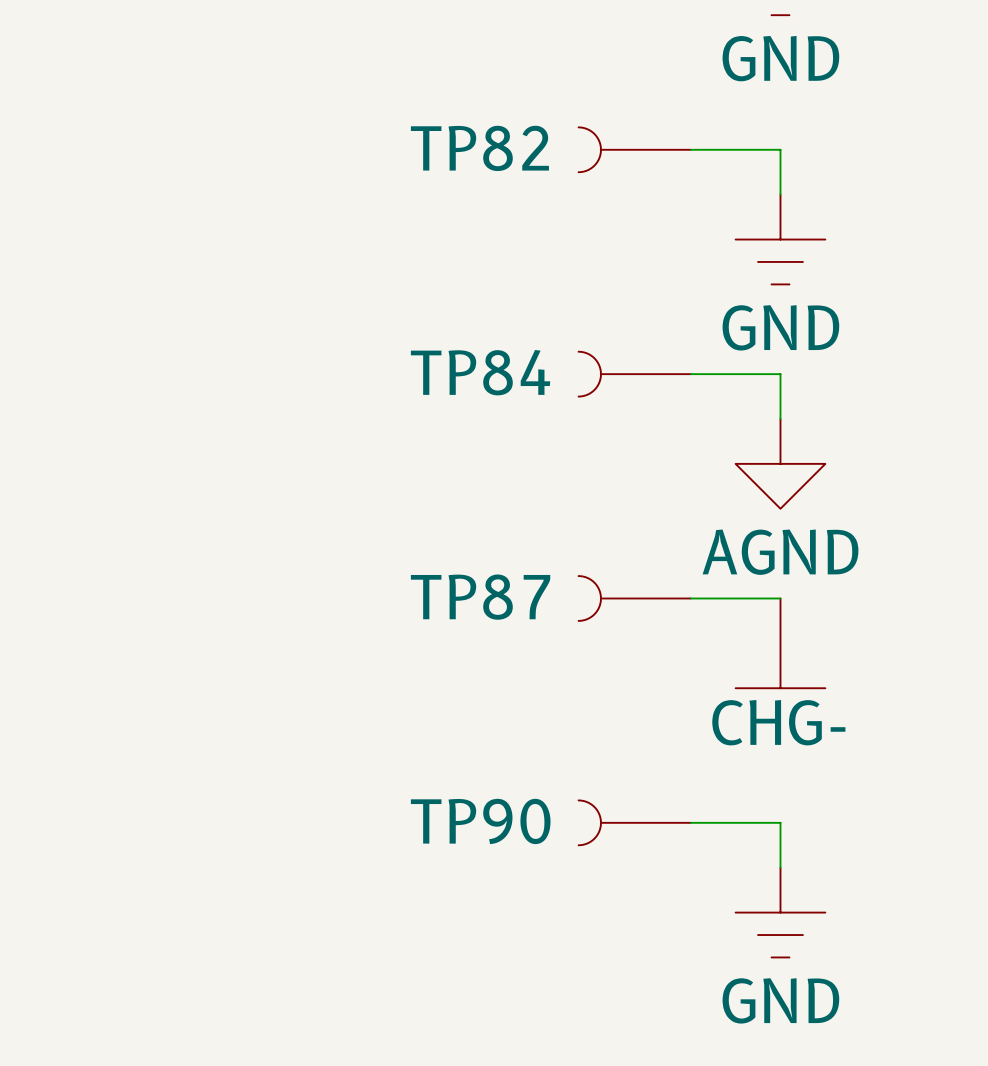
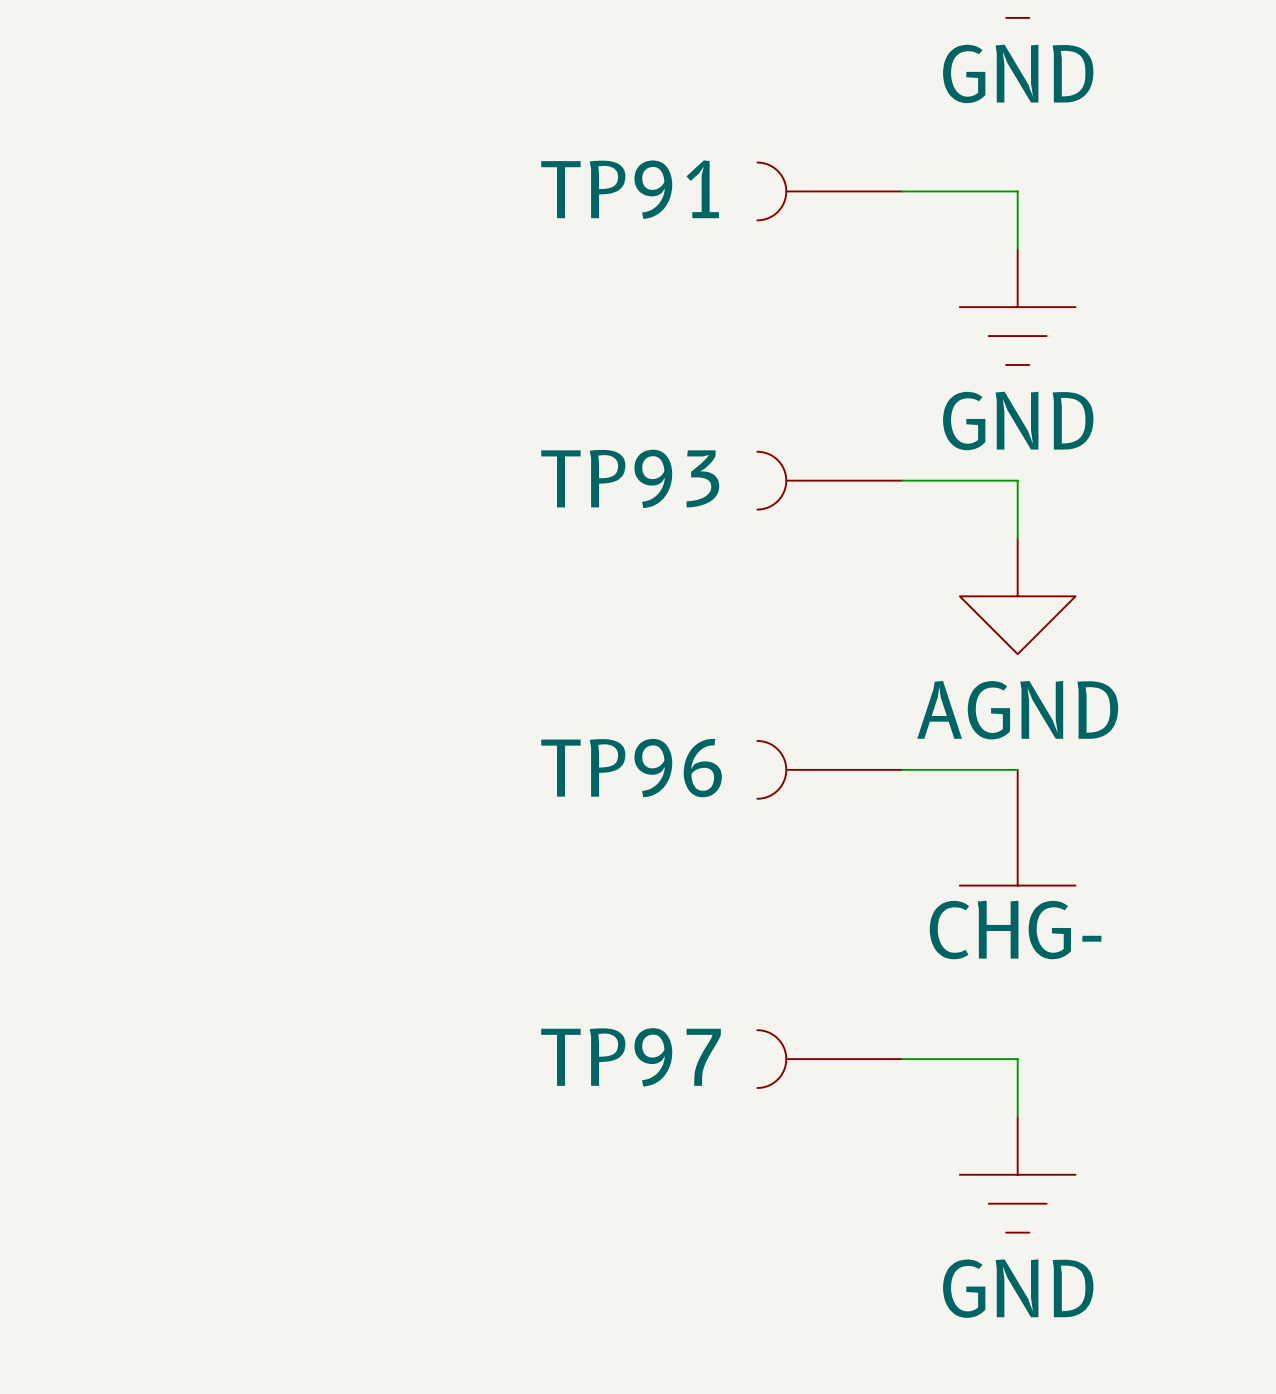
TP82 name: TP82 (479, 148) -> TP91 (630, 189)
TP84 name: TP84 (480, 372) -> TP93 (630, 478)
TP87 name: TP87 (480, 597) -> TP96 (631, 768)
TP90 name: TP90 (480, 821) -> TP97 (631, 1057)

